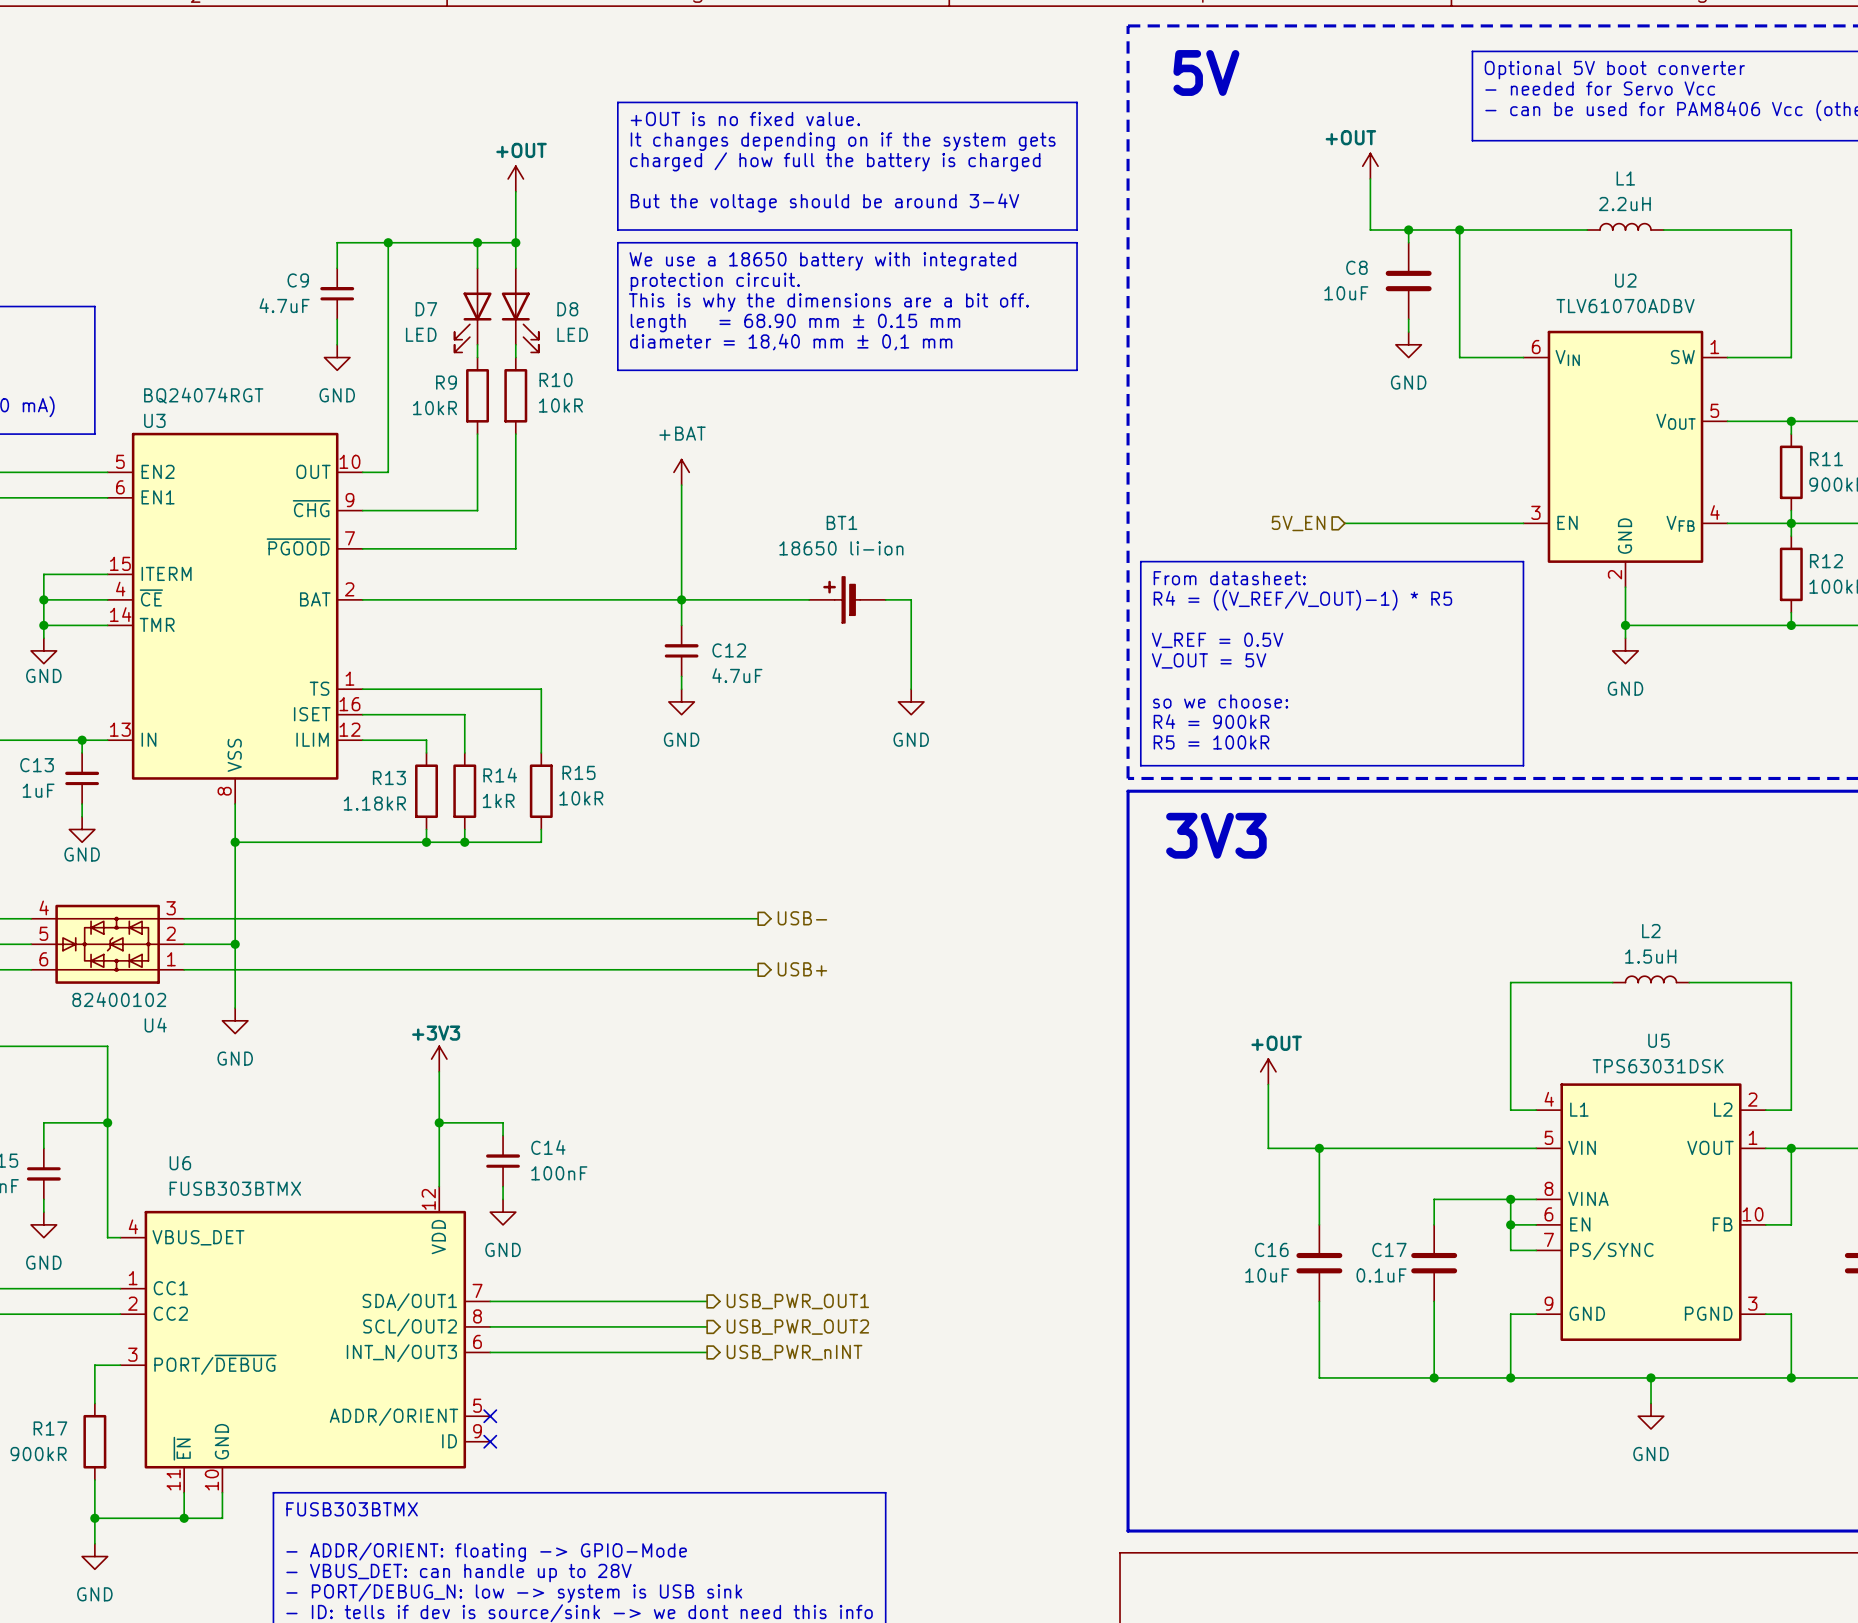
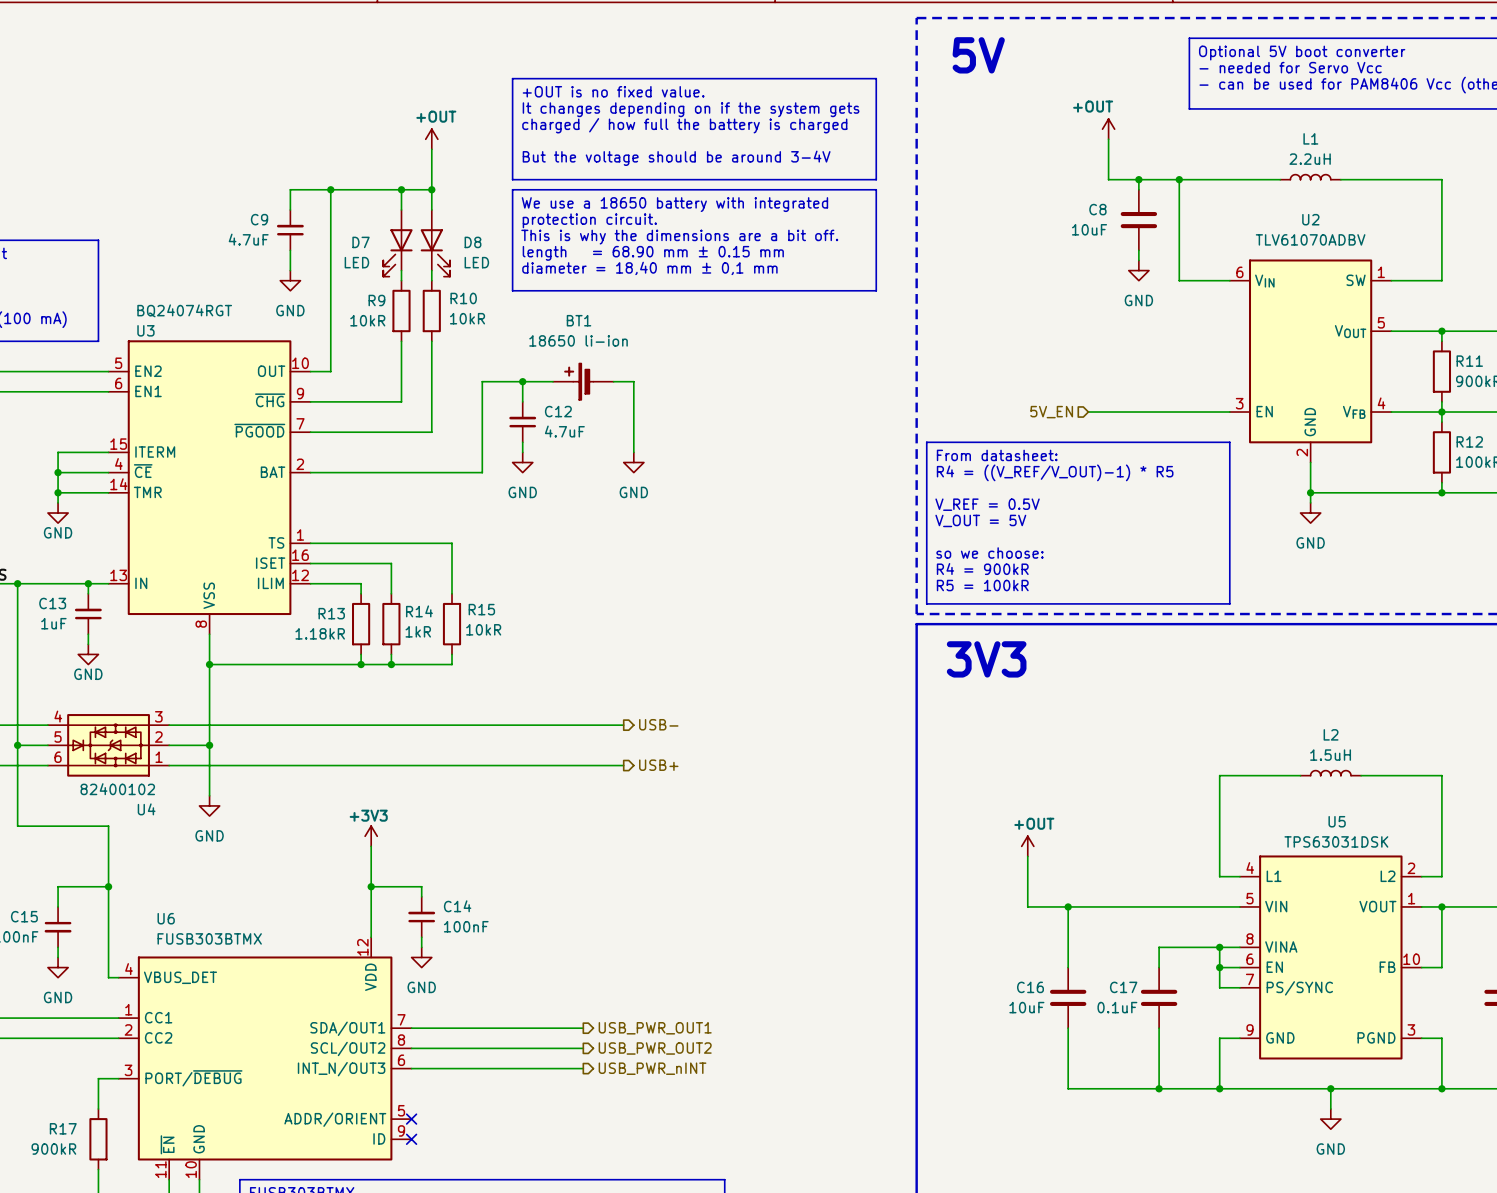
power symbol: +BAT (681, 472) -> none
wire: none -> (522, 381) (522, 401)
junction: none -> (522, 381)
wire: (681, 485) (681, 625) -> none
power symbol: none -> GND (522, 462)
power symbol: none -> GND (633, 462)
wire: (579, 599) (809, 599) -> (482, 472) (482, 381) (553, 381)
junction: (681, 599) -> none
BT1 position: (847, 599) -> (583, 381)
wire: (885, 599) (911, 599) (911, 689) -> (613, 381) (633, 381) (633, 452)
C12 position: (681, 650) -> (522, 422)
C12 name position: C12 (729, 650) -> C12 (558, 411)
C12 value position: 4.7uF (737, 675) -> 4.7uF (564, 431)
wire: (681, 676) (681, 689) -> (522, 442) (522, 452)
power symbol: GND (681, 701) -> none
power symbol: GND (911, 701) -> none

